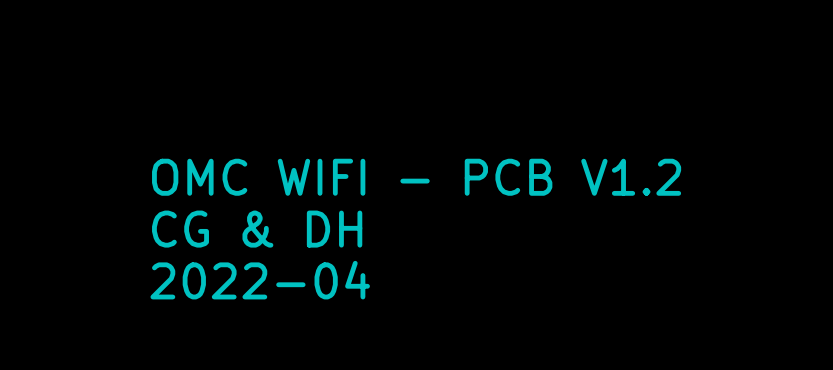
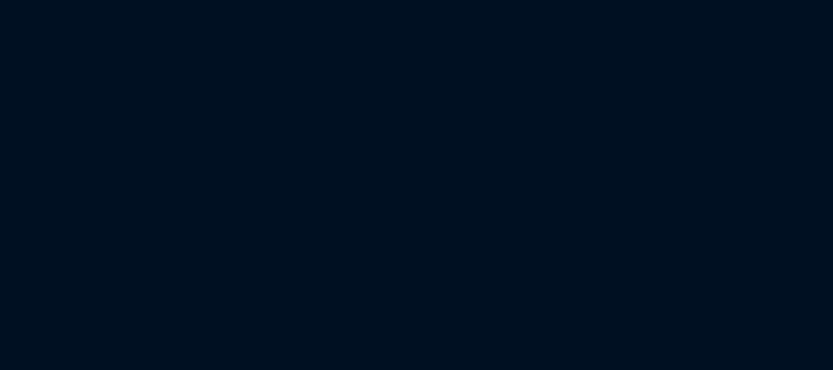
text: OMC WIFI - PCB V1.2 (416, 177) -> none
text: CG & DH (257, 229) -> none
text: 2022-04 (260, 280) -> none

